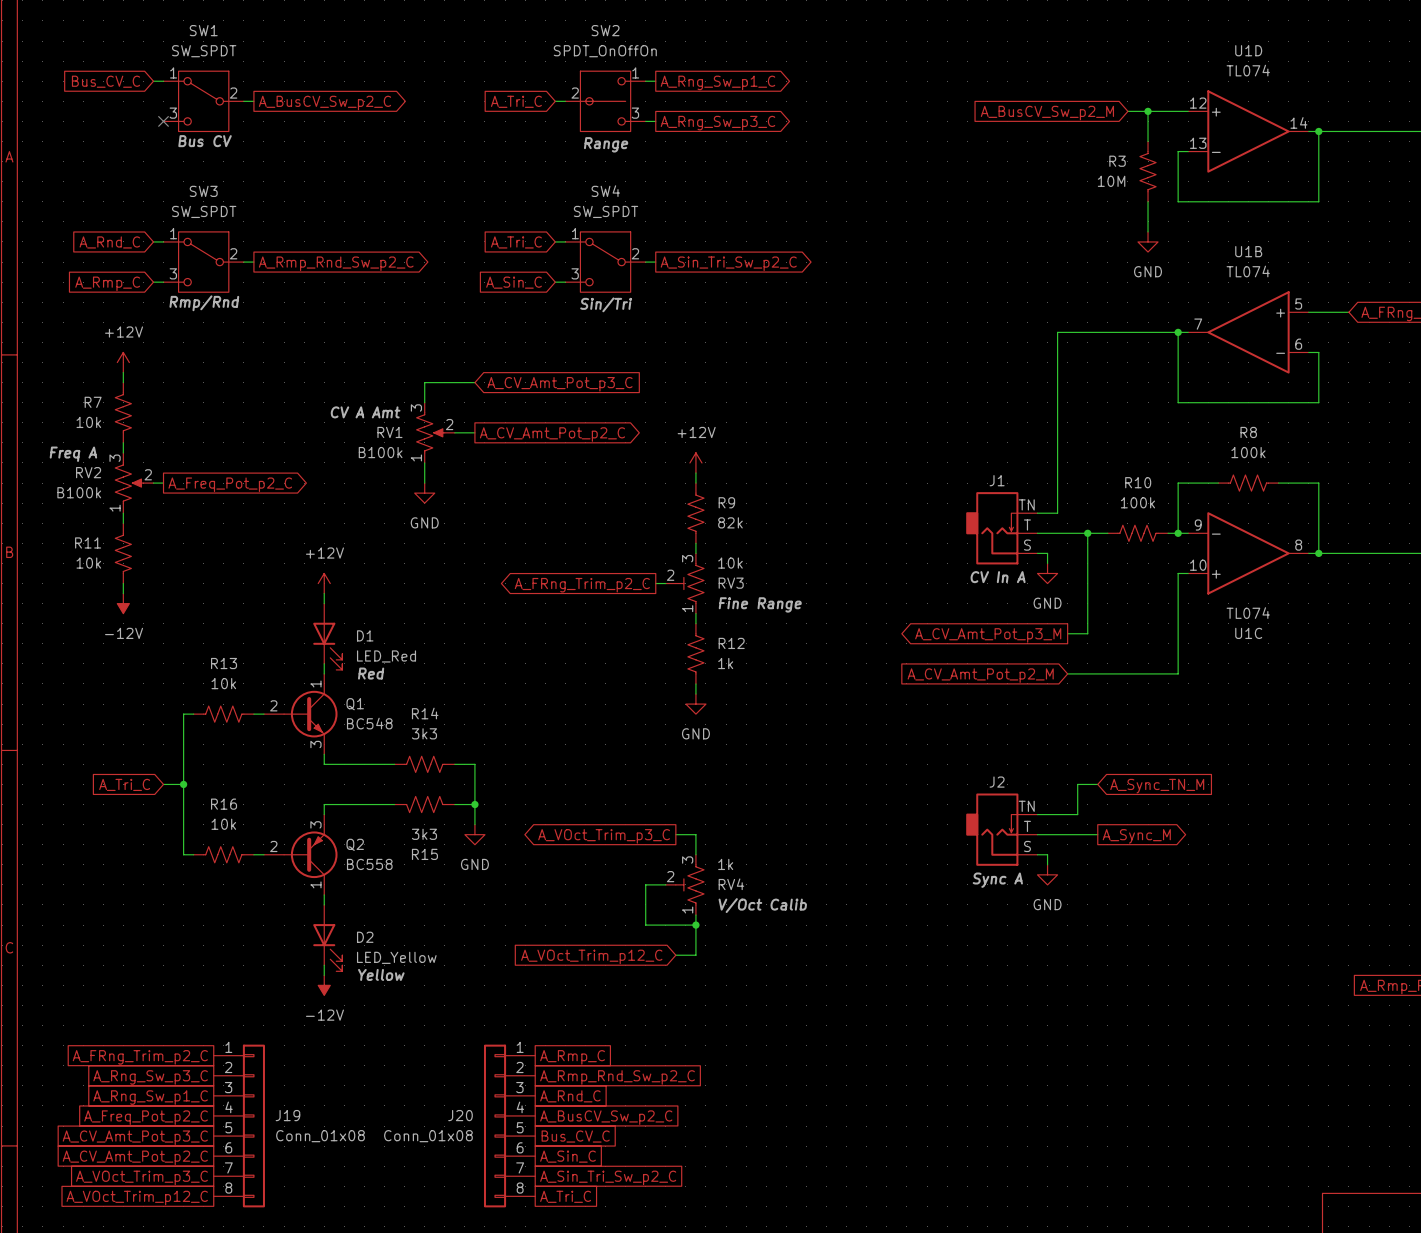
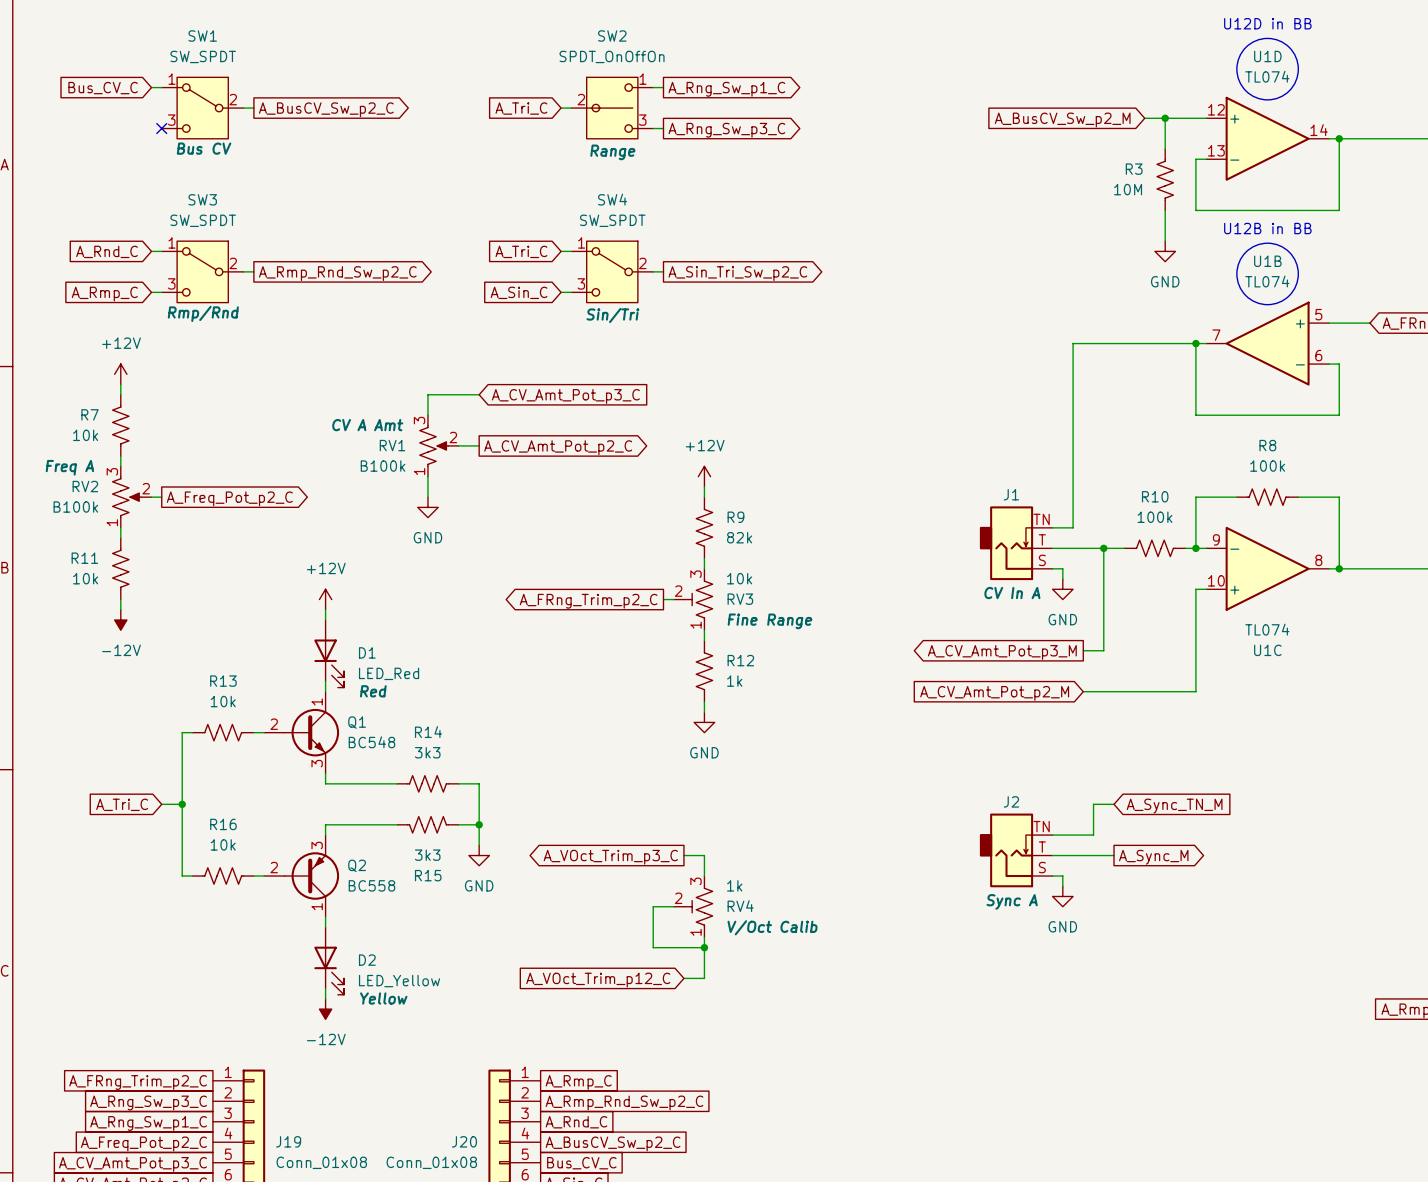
text: none -> U12D in BB (1267, 23)
drawing: none -> [1236, 38, 1299, 100]
text: none -> U12B in BB (1267, 228)
drawing: none -> [1236, 243, 1299, 305]

